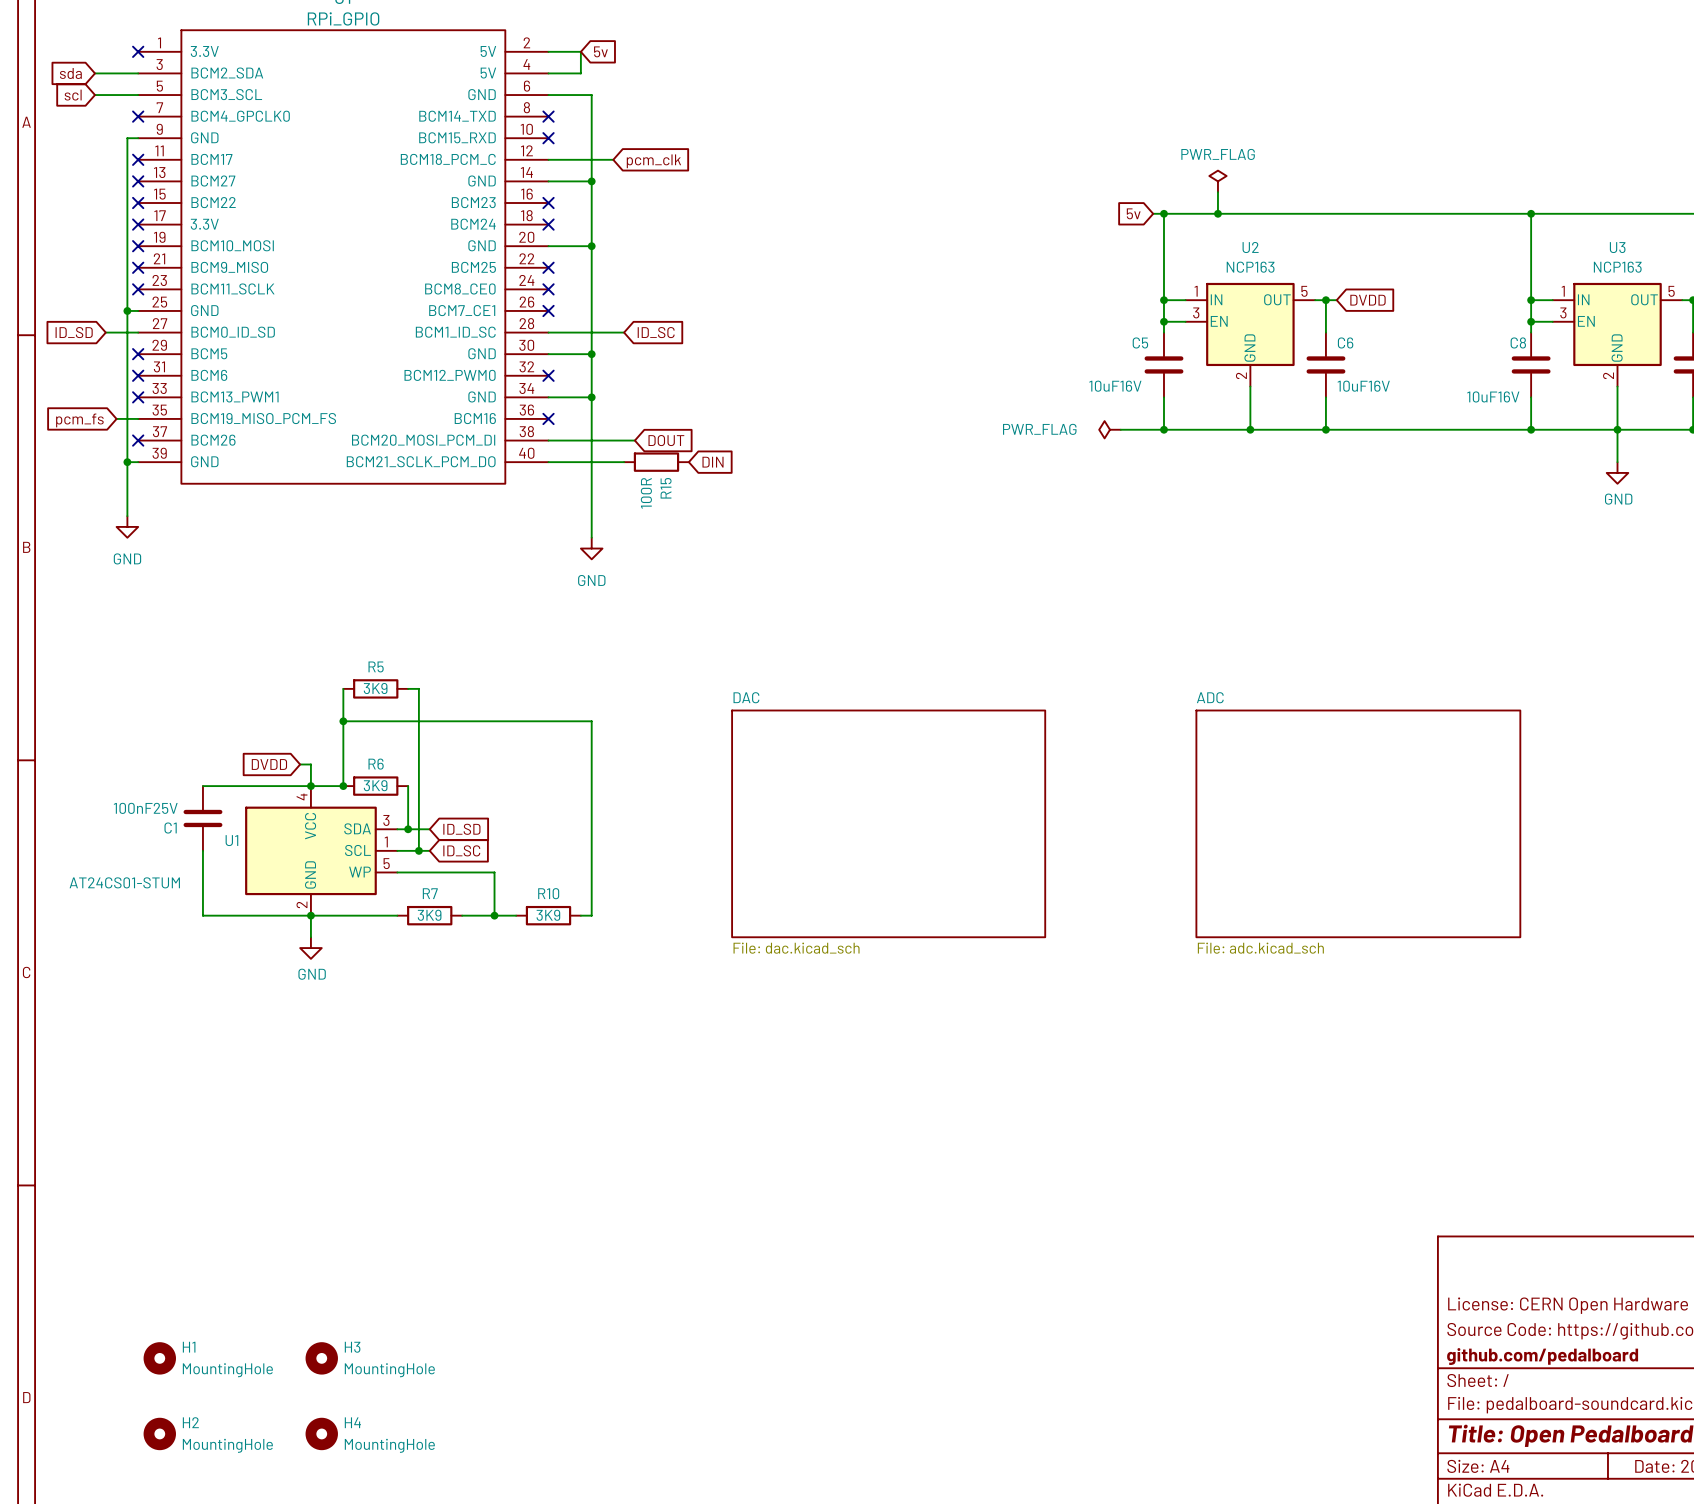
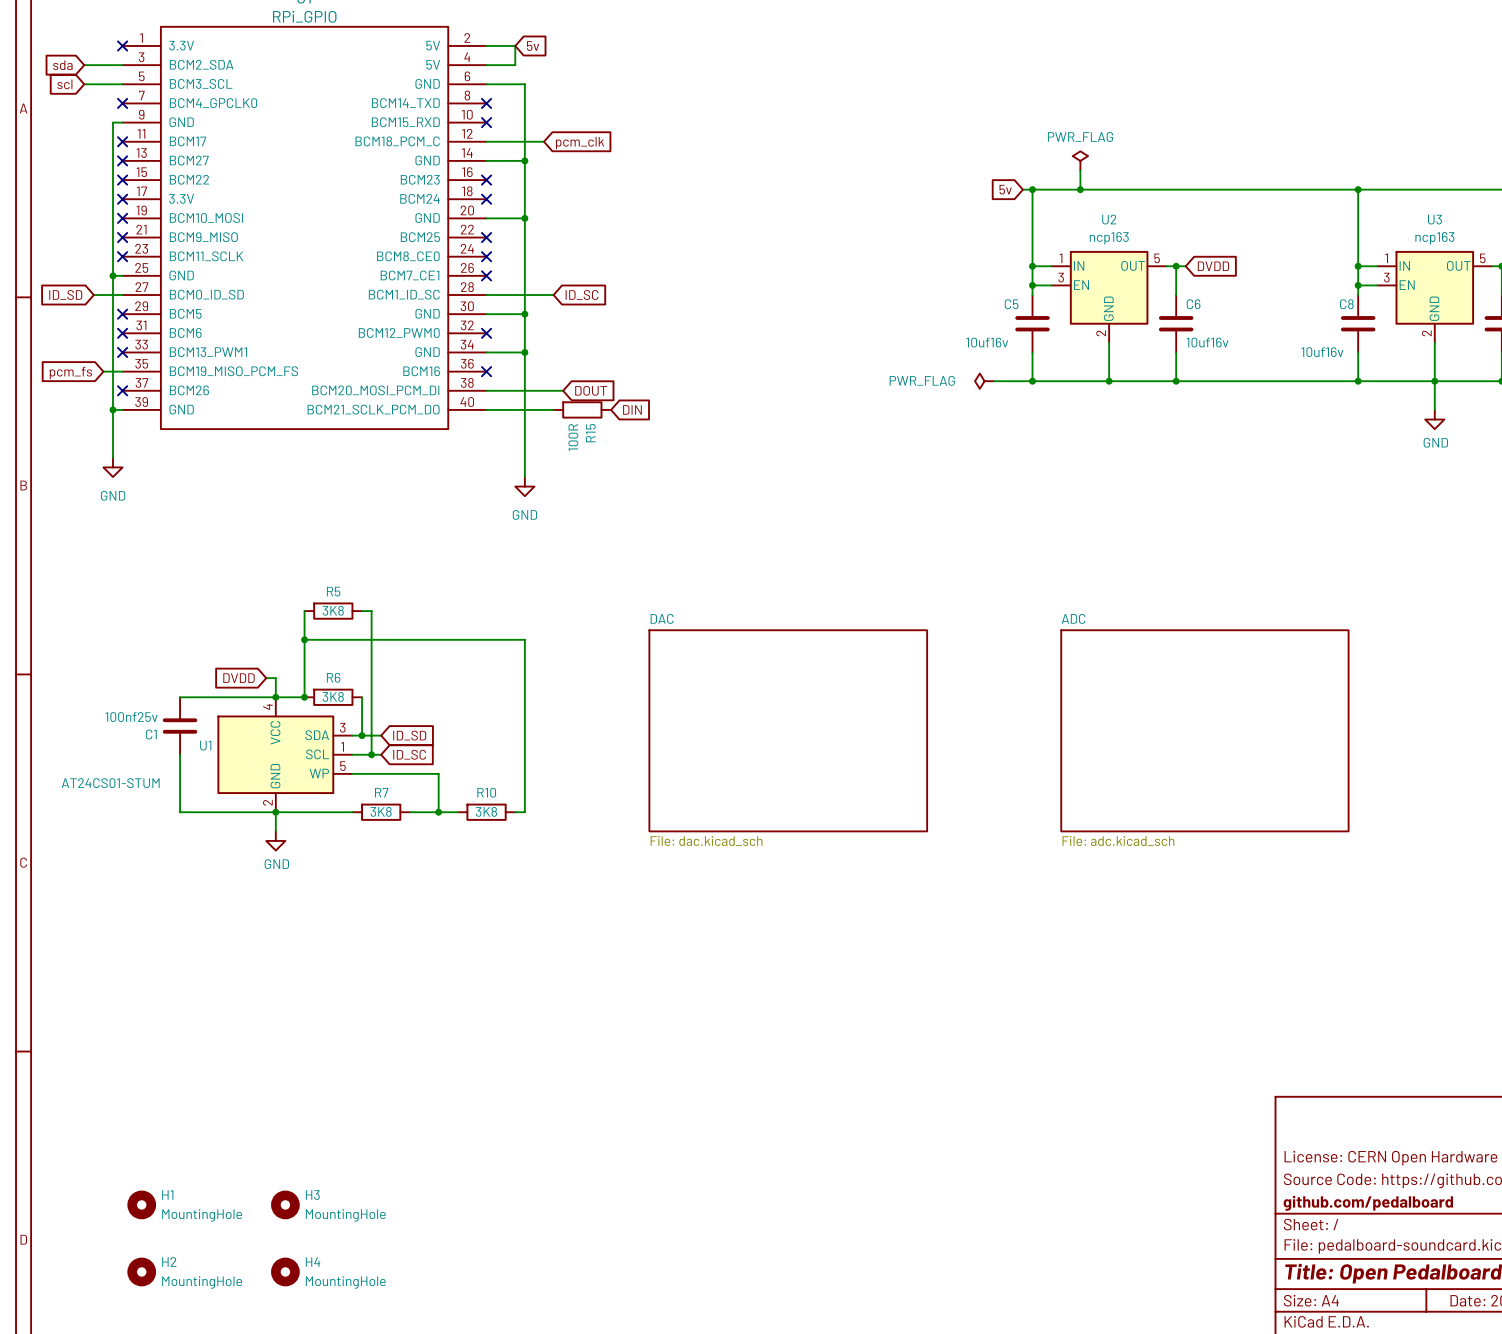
U2 value: NCP163 (1250, 267) -> ncp163 (1109, 238)
U3 value: NCP163 (1617, 267) -> ncp163 (1434, 238)
C5 value: 10uF16V (1115, 386) -> 10uf16v (987, 342)
C6 value: 10uF16V (1363, 386) -> 10uf16v (1207, 342)
C8 value: 10uF16V (1493, 396) -> 10uf16v (1322, 352)
R5 value: 3K9 (375, 688) -> 3K8 (333, 610)
R6 value: 3K9 (375, 785) -> 3K8 (333, 696)
C1 value: 100nF25V (145, 808) -> 100nf25v (131, 717)
R7 value: 3K9 (429, 915) -> 3K8 (381, 811)
R10 value: 3K9 (548, 915) -> 3K8 (486, 811)

